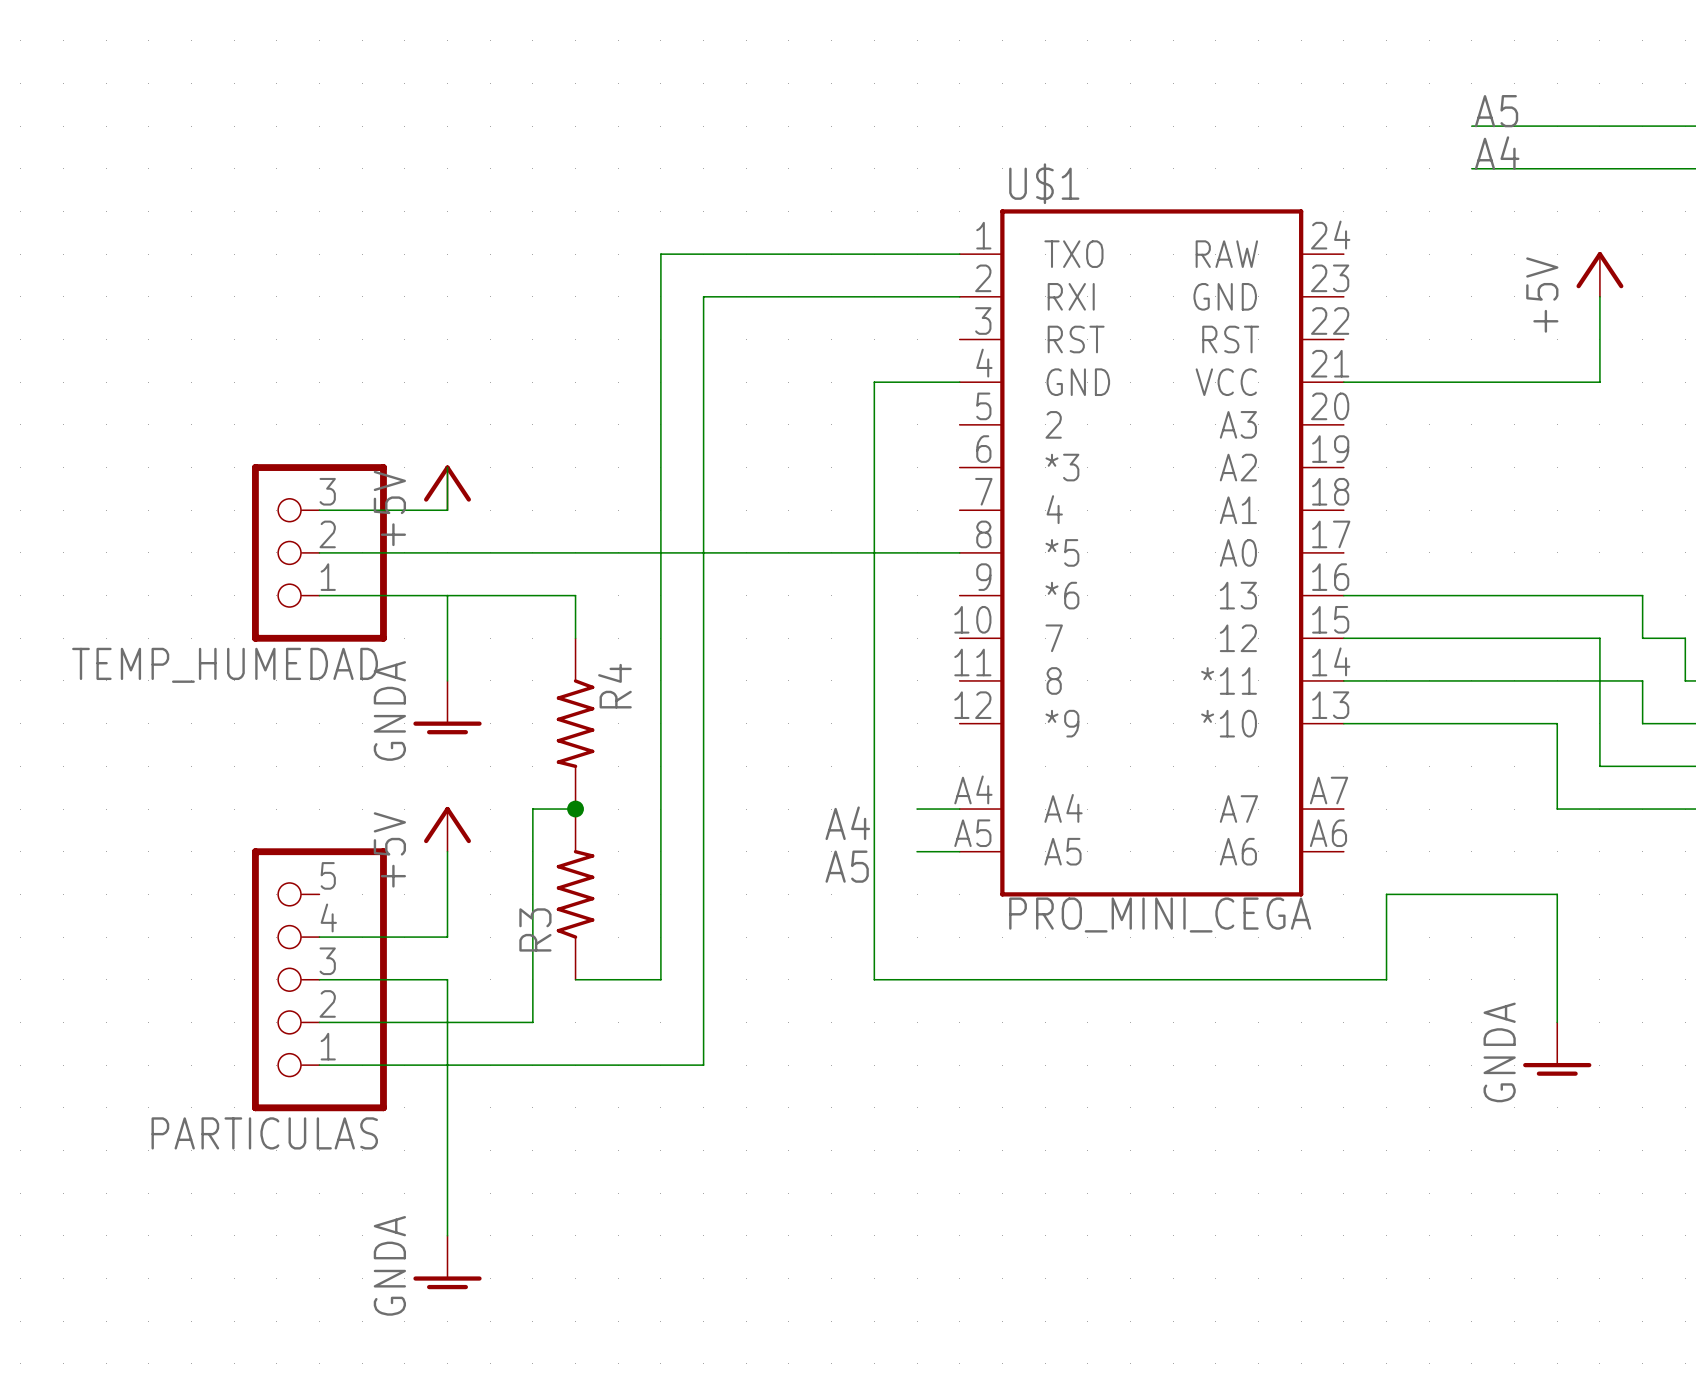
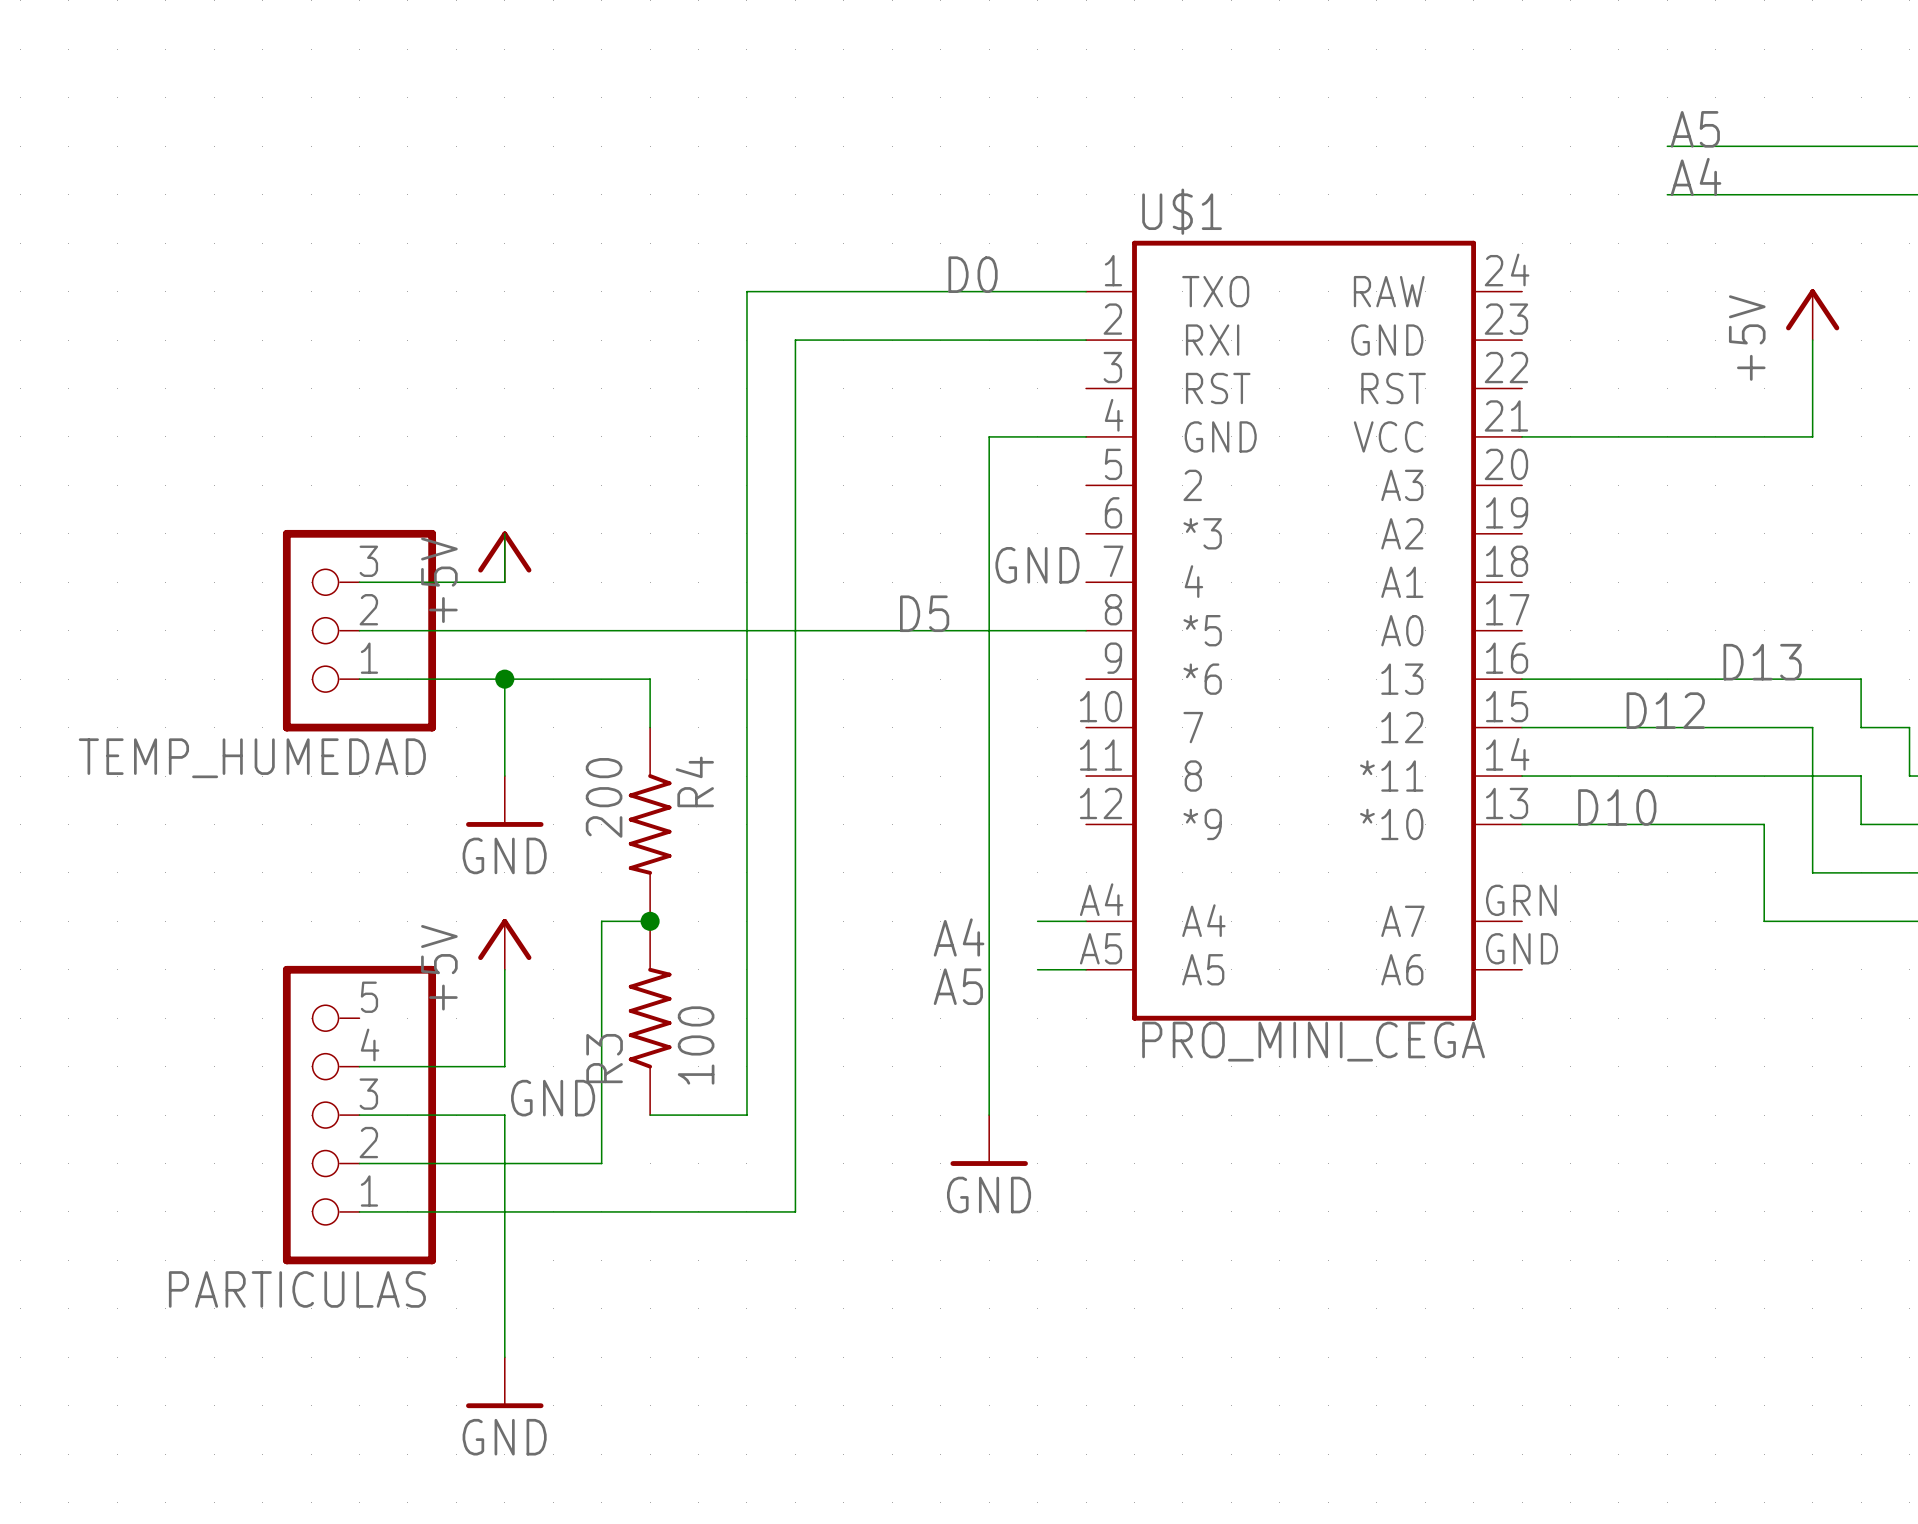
label: none -> D0 (973, 274)
label: none -> GND (1037, 565)
label: none -> D5 (924, 613)
label: none -> D13 (1762, 662)
junction: none -> (504, 679)
label: none -> D12 (1665, 710)
R4 value: none -> 200 (604, 797)
power symbol: GNDA (447, 707) -> GND (504, 801)
label: none -> D10 (1617, 807)
U$1 pin number: A7 (1329, 790) -> GRN (1521, 900)
U$1 pin number: A6 (1328, 833) -> GND (1522, 948)
R3 value: none -> 100 (696, 1045)
label: none -> GND (553, 1098)
wire: (874, 979) (1386, 979) (1386, 894) (1557, 894) (1557, 1022) -> none
power symbol: none -> GND (989, 1140)
power symbol: GNDA (1557, 1049) -> none
power symbol: none -> GND (504, 1382)
power symbol: GNDA (447, 1262) -> none

